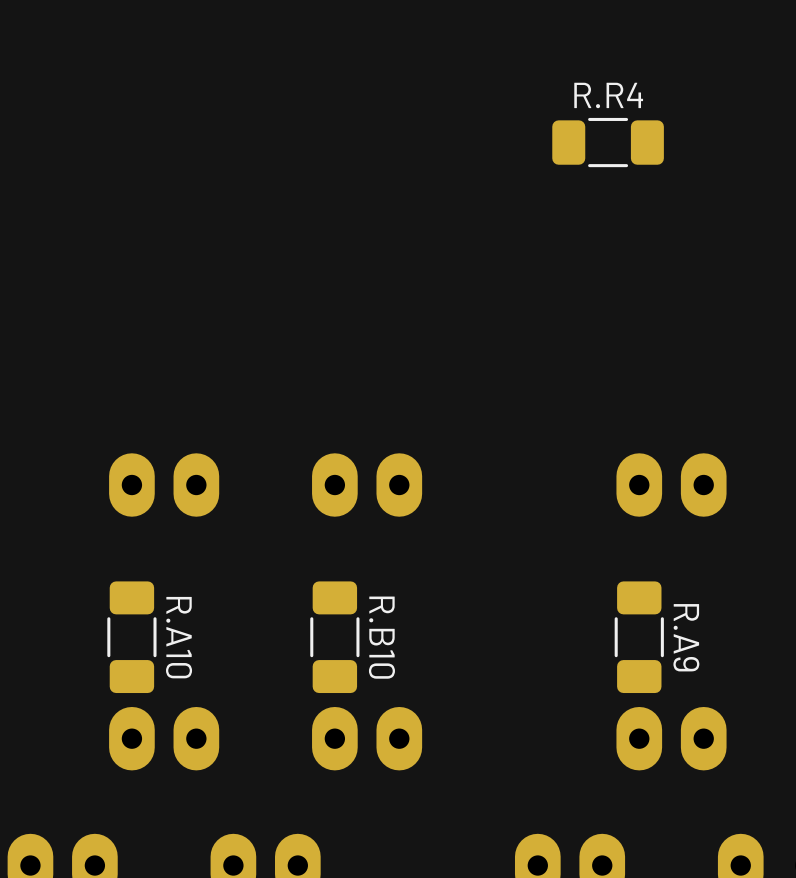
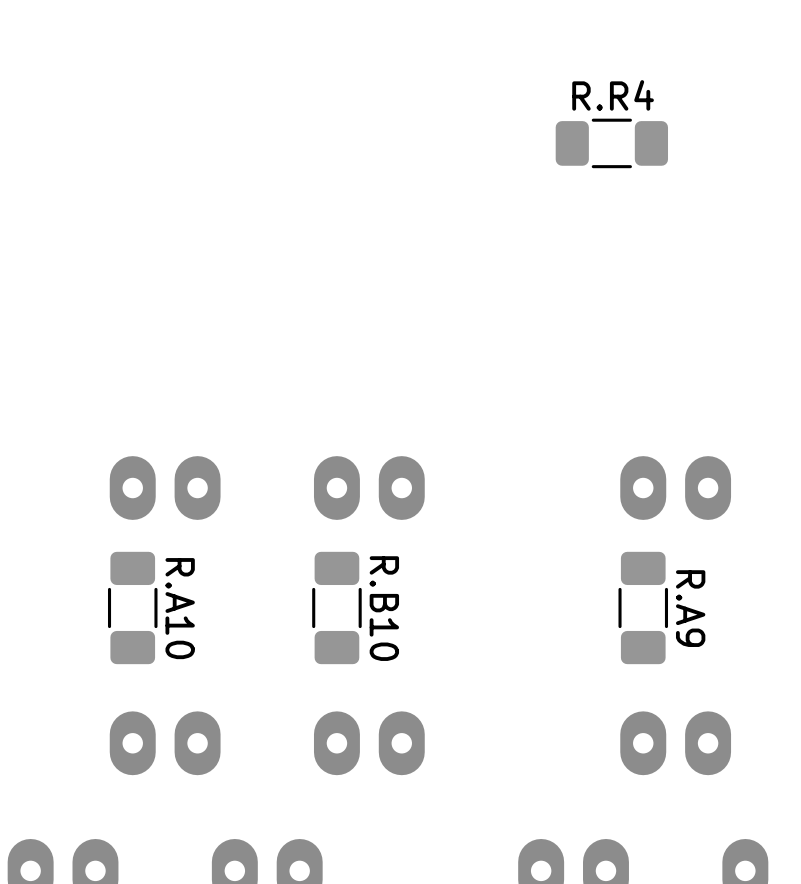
R.A10 position: (131, 637) -> (132, 607)
R.B10 position: (334, 637) -> (336, 607)
R.A9 position: (639, 637) -> (643, 607)

